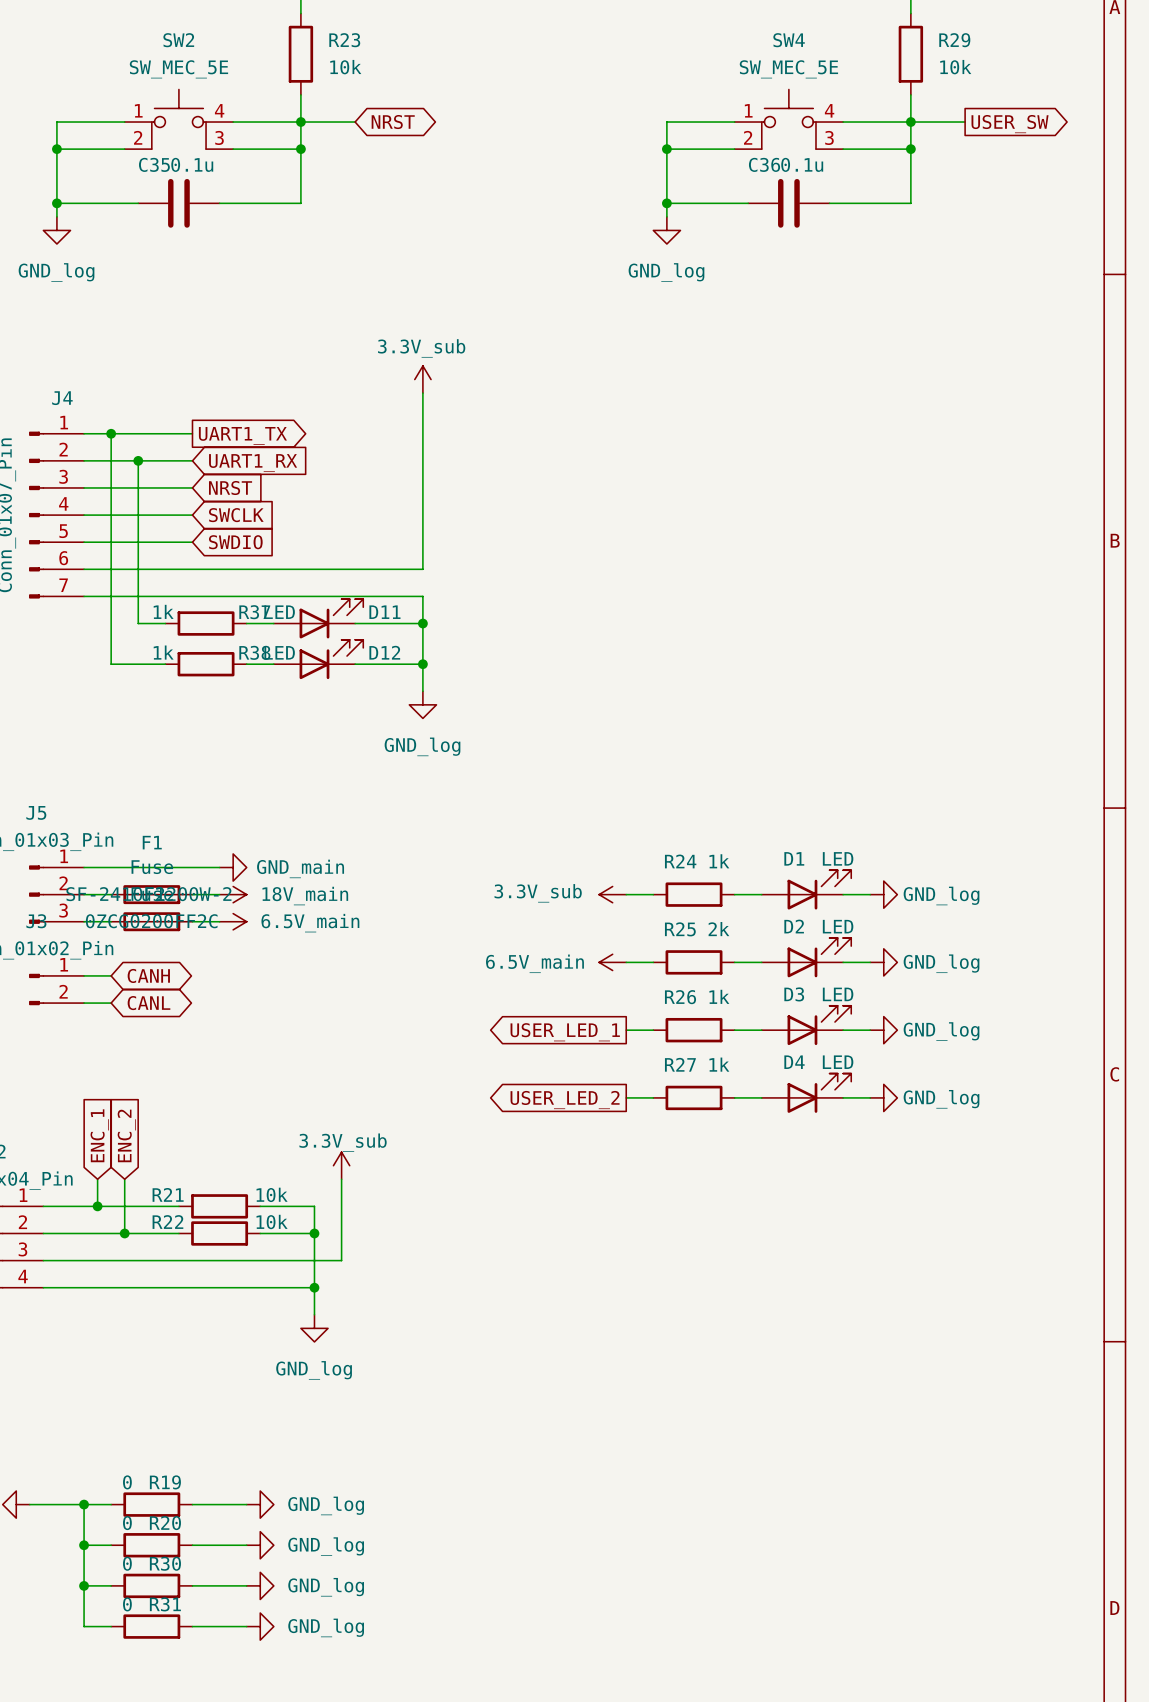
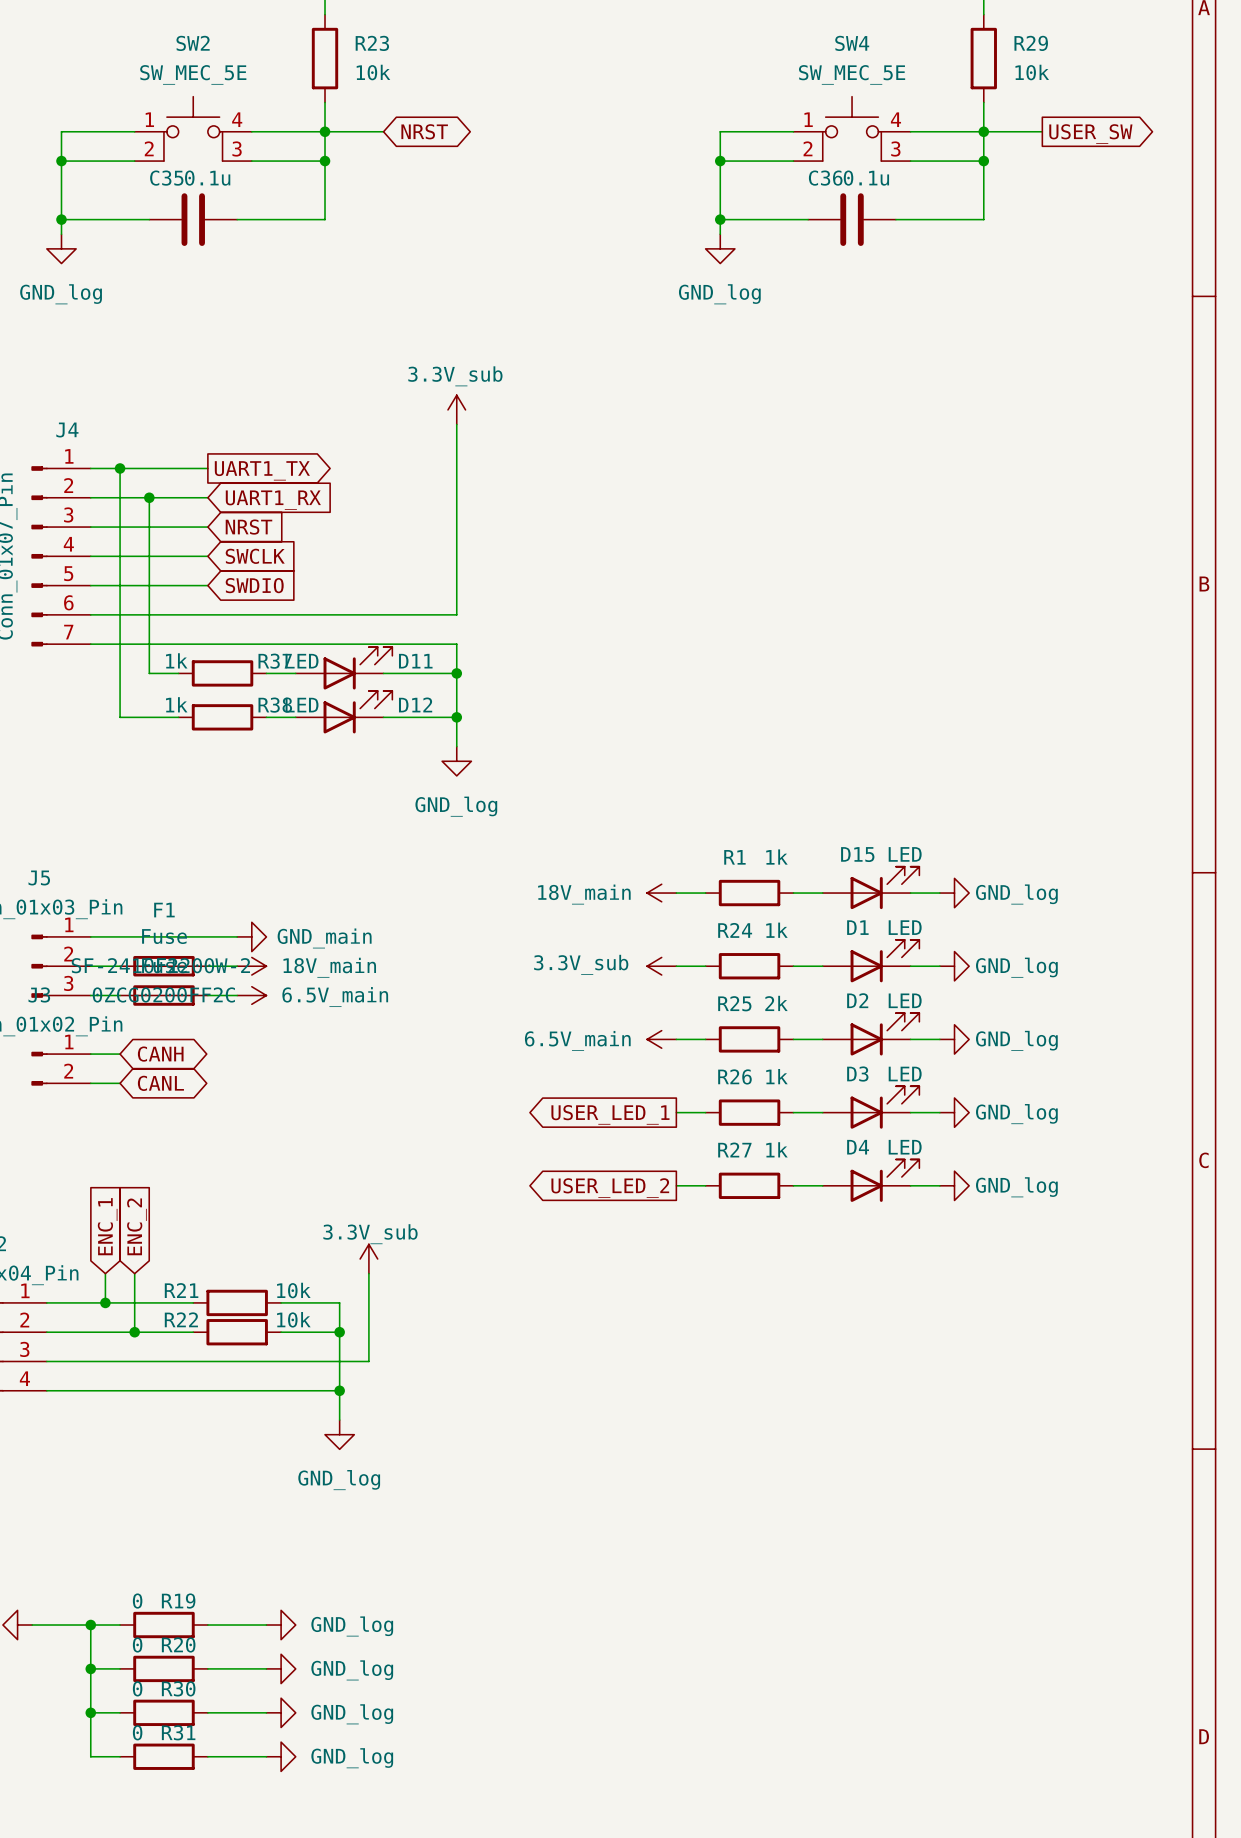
D15: none -> LED (871, 887)
power symbol: none -> 18V_main (661, 893)
wire: none -> (676, 893) (705, 893)
R1: none -> 1k (749, 893)
wire: none -> (793, 893) (822, 893)
wire: none -> (910, 893) (939, 893)
power symbol: none -> GND_log (954, 893)

